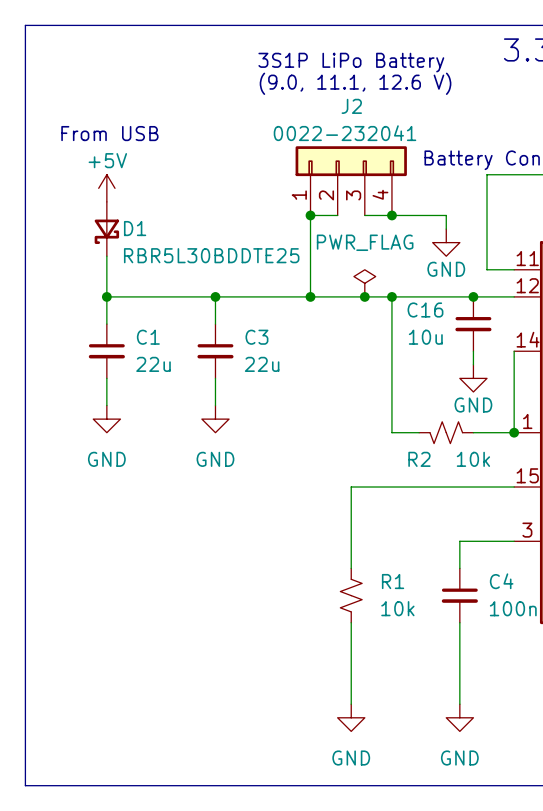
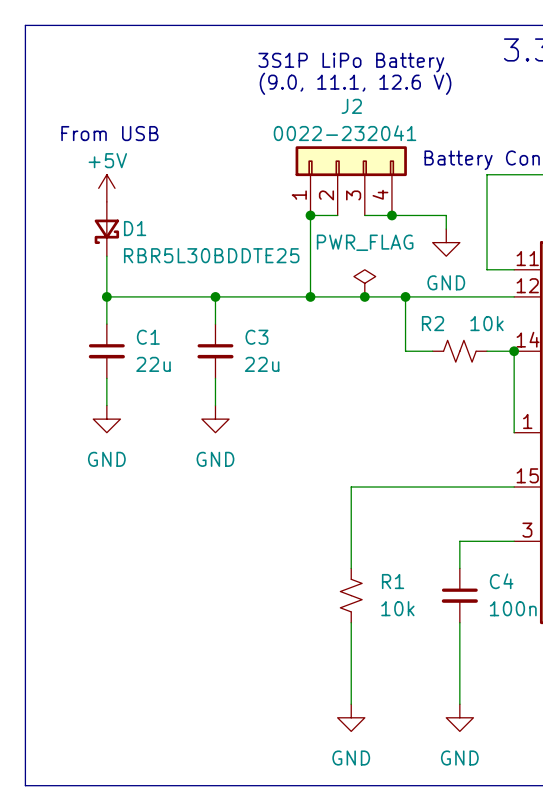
power symbol text position: GND (446, 269) -> GND (446, 282)
wire: (391, 296) (391, 432) (419, 432) -> none
junction position: (391, 296) -> (405, 296)
wire: none -> (405, 296) (405, 351) (432, 351)
junction: (473, 296) -> none
C16: 10u (473, 324) -> none
wire: (473, 351) (473, 364) -> none
wire: none -> (487, 351) (514, 351)
junction: none -> (514, 351)
power symbol: GND (473, 378) -> none
R2 flip: as is (446, 432) -> left-right (459, 351)
R2 position: (446, 432) -> (459, 351)
wire: (473, 432) (514, 432) -> none
junction: (514, 432) -> none
R2 name position: R2 (419, 459) -> R2 (433, 323)
R2 value position: 10k (473, 459) -> 10k (487, 323)

